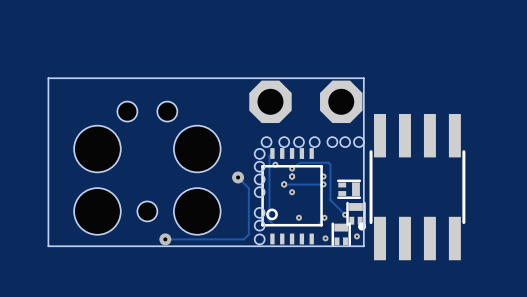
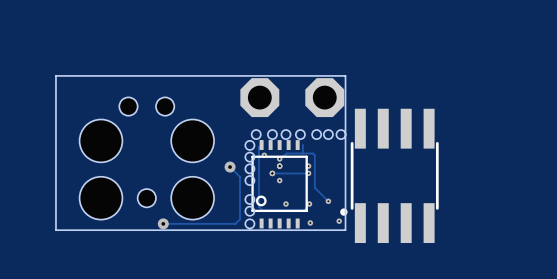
track: none -> (303, 145) (302, 153)
part: (349, 189) -> none
part: (355, 213) -> none
part: (341, 234) -> none

